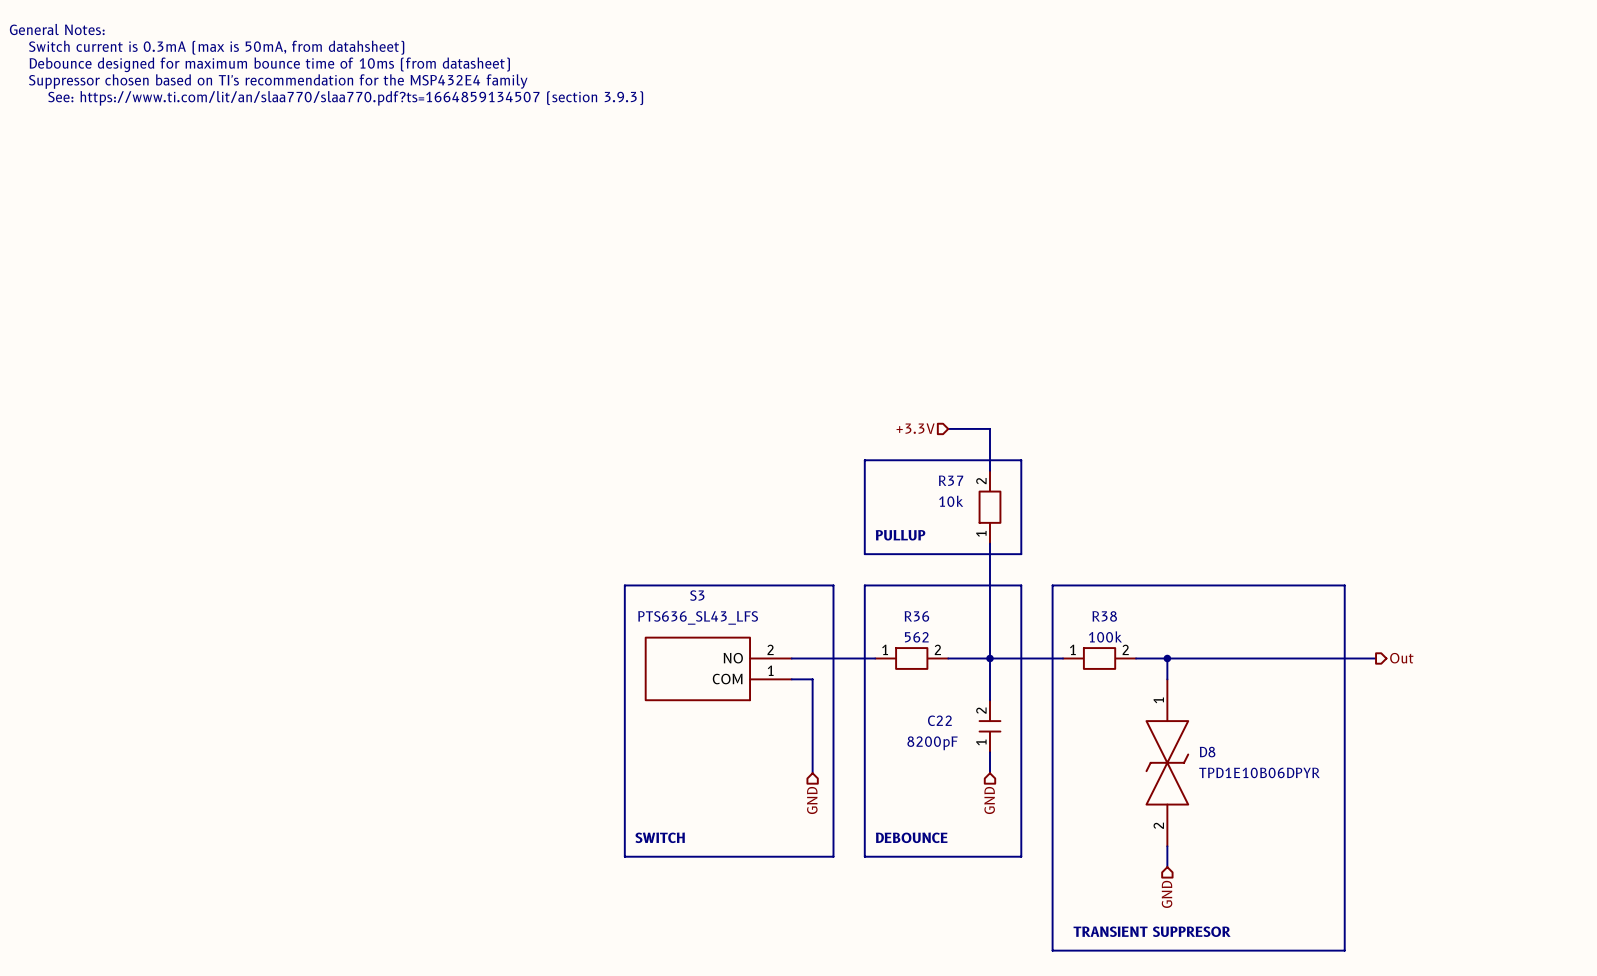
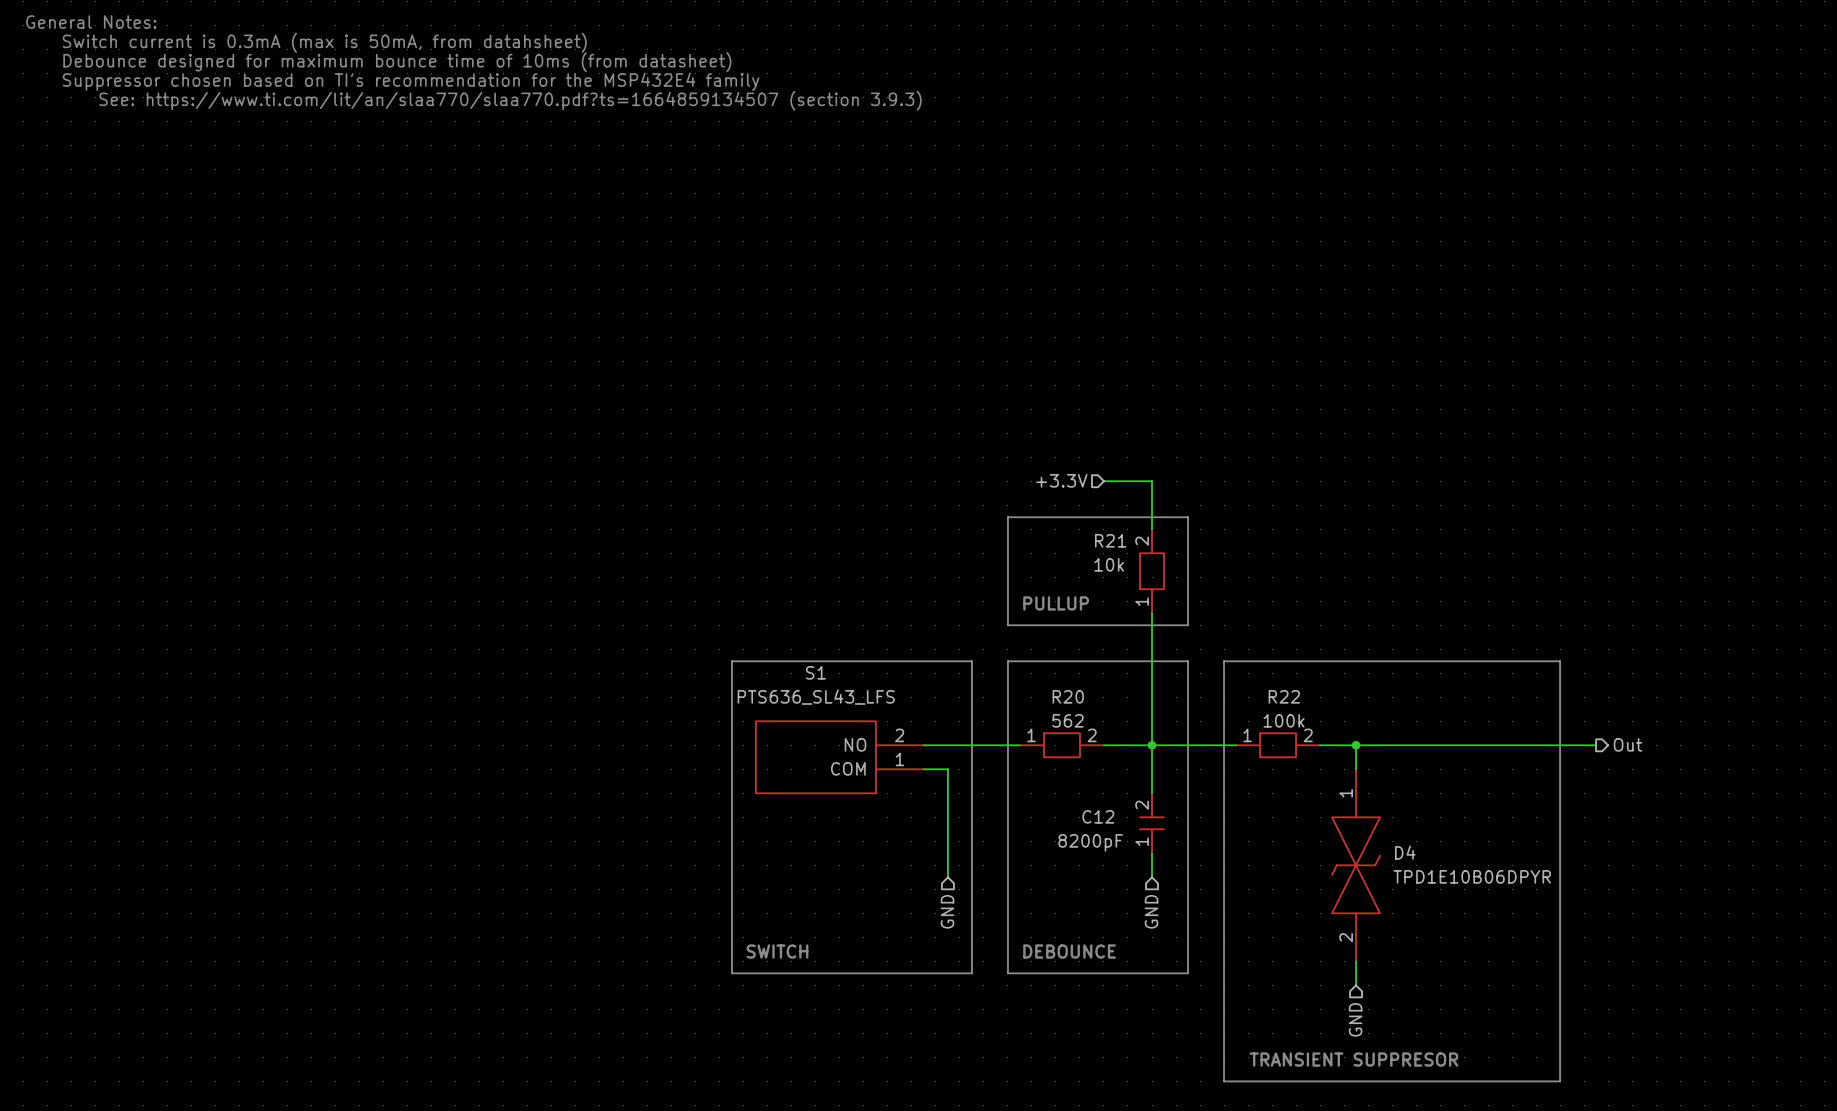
R37 name: R37 (951, 480) -> R21 (1110, 540)
S3 name: S3 (697, 595) -> S1 (815, 672)
R36 name: R36 (916, 616) -> R20 (1068, 696)
R38 name: R38 (1104, 616) -> R22 (1284, 696)
C22 name: C22 (939, 720) -> C12 (1098, 816)
D8 name: D8 (1207, 752) -> D4 (1405, 852)

